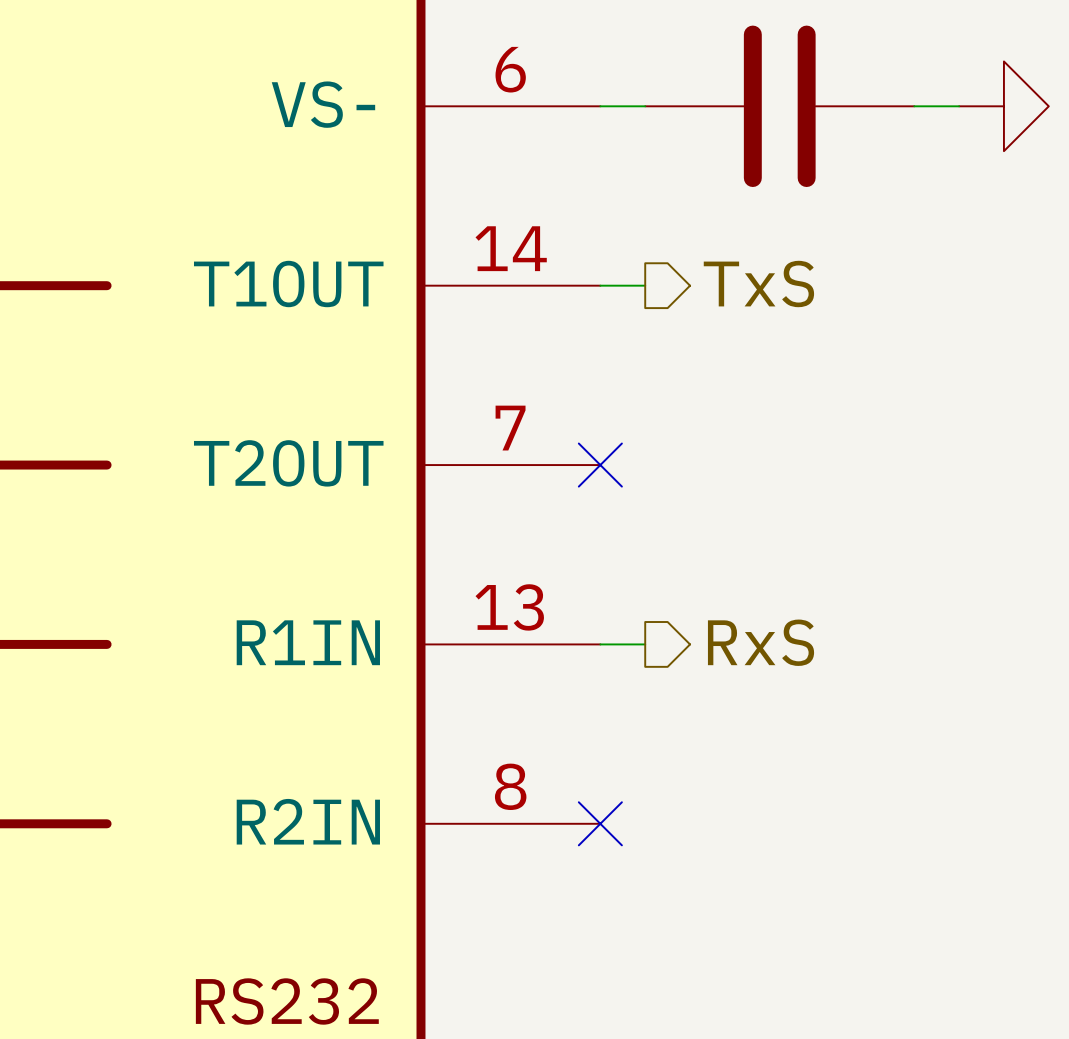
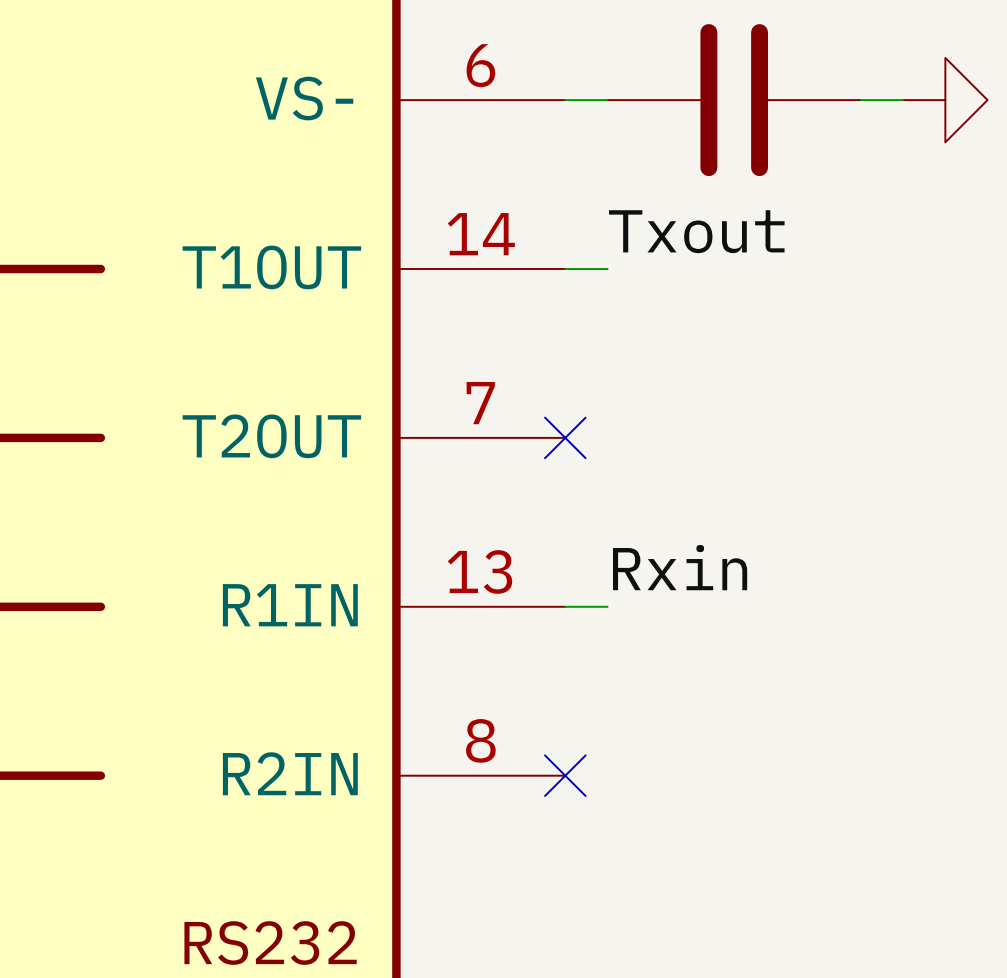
label: none -> Txout (696, 231)
hierarchical label: TxS (758, 284) -> none
label: none -> Rxin (680, 567)
hierarchical label: RxS (761, 642) -> none

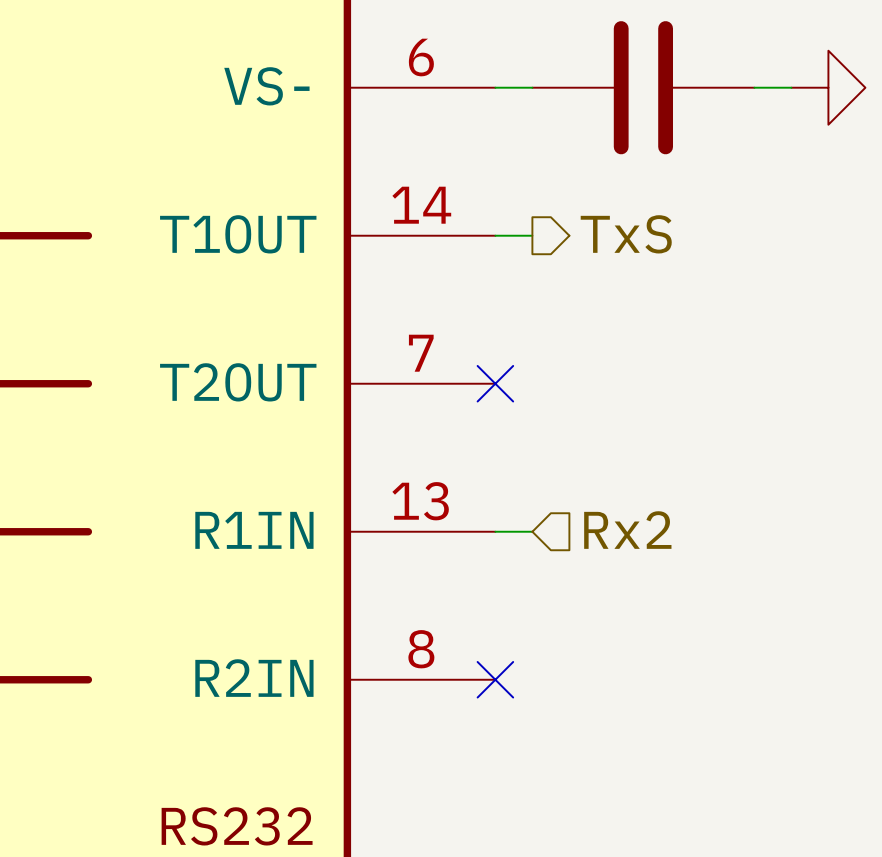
label: Txout (696, 231) -> none
hierarchical label: none -> TxS (626, 234)
label: Rxin (680, 567) -> none
hierarchical label: none -> Rx2 (627, 530)

